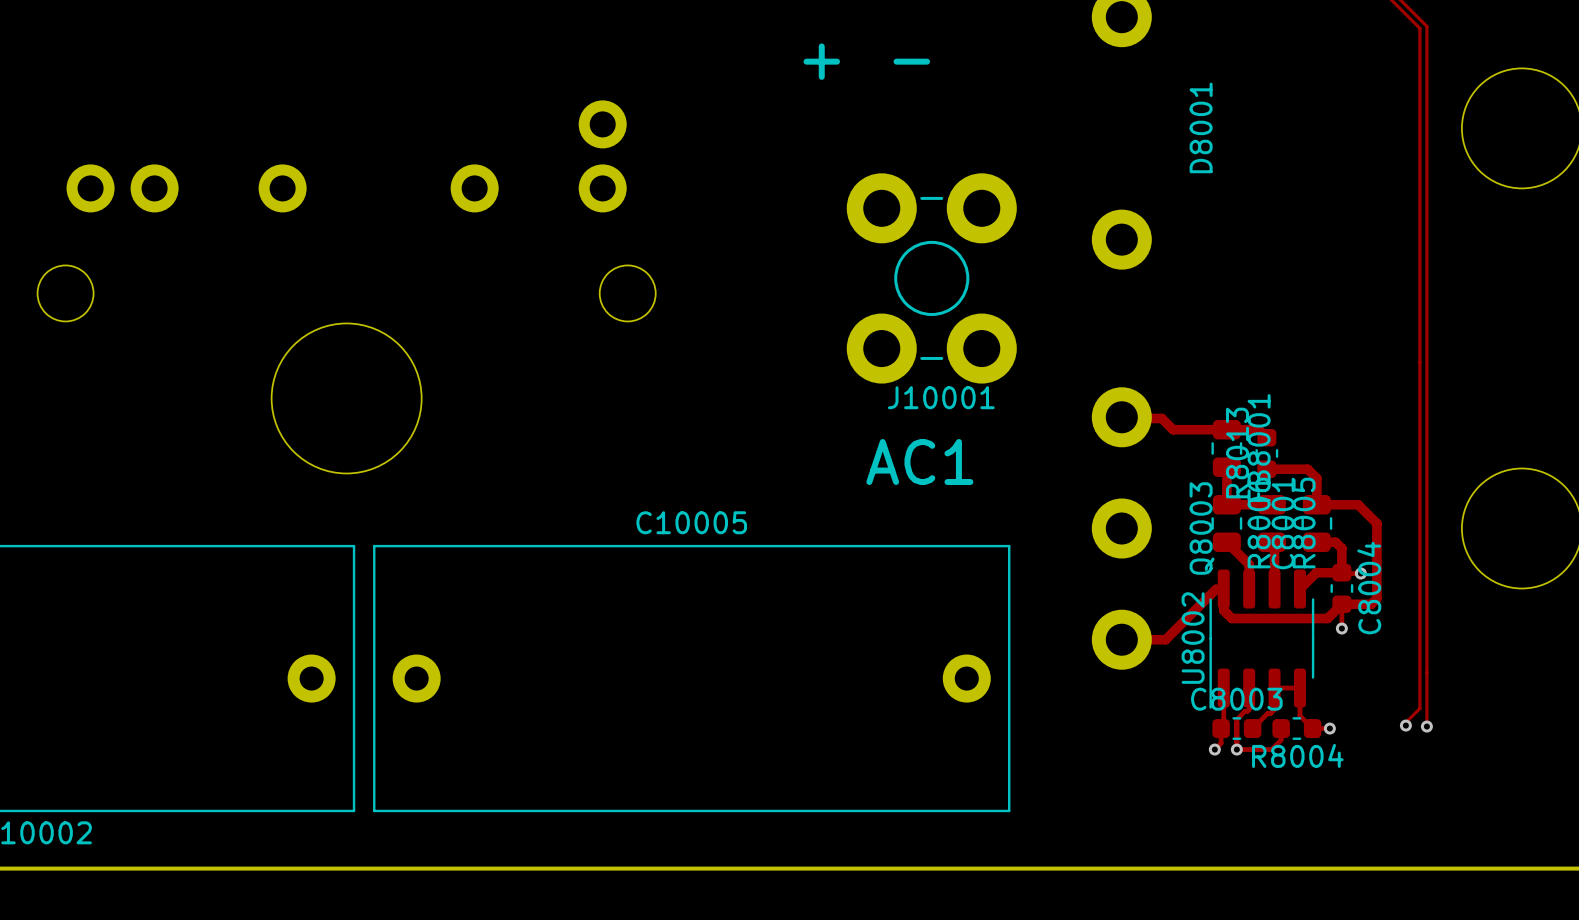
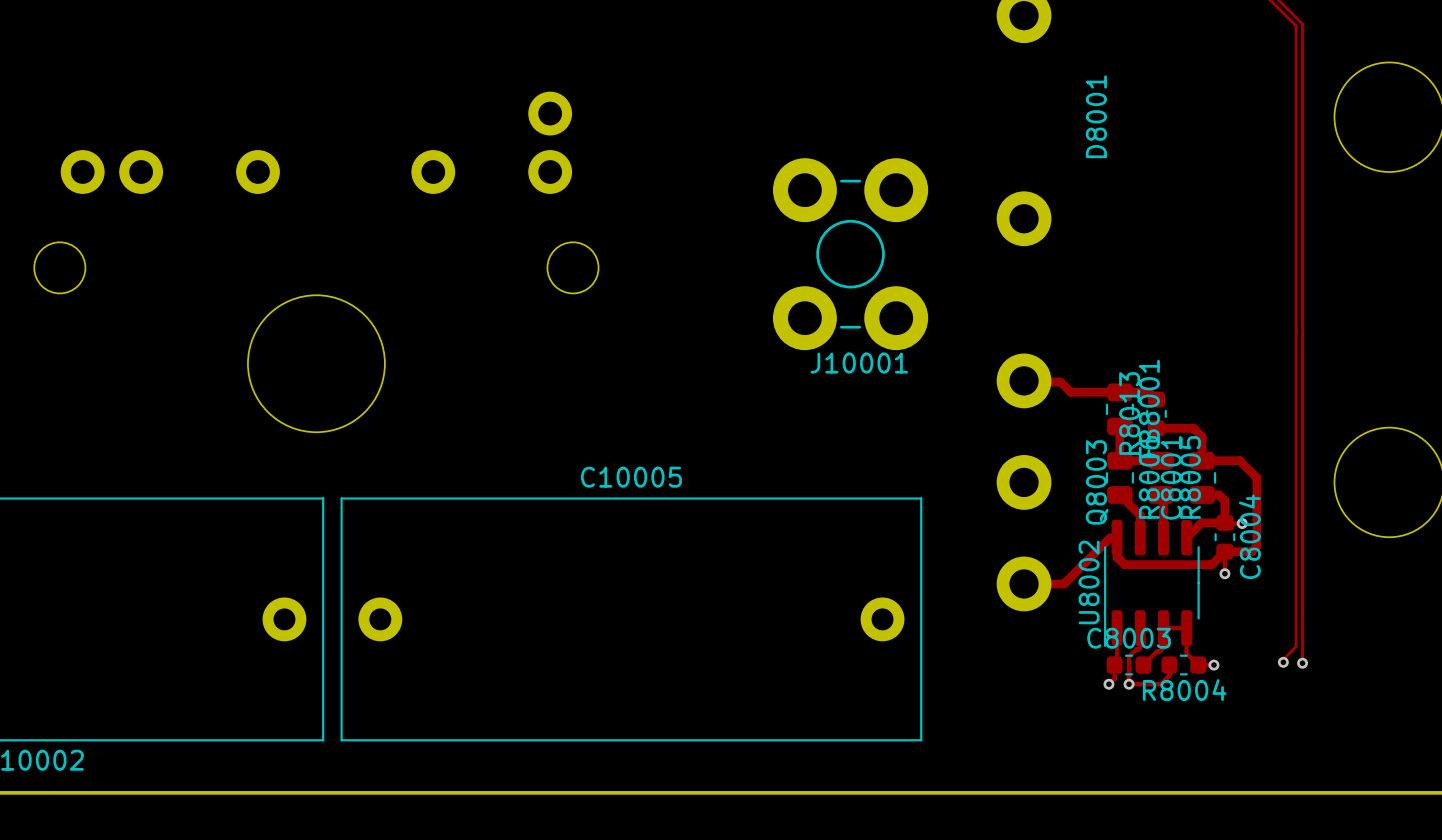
text: + (821, 61) -> none
text: - (911, 61) -> none
text: AC1 (919, 461) -> none

